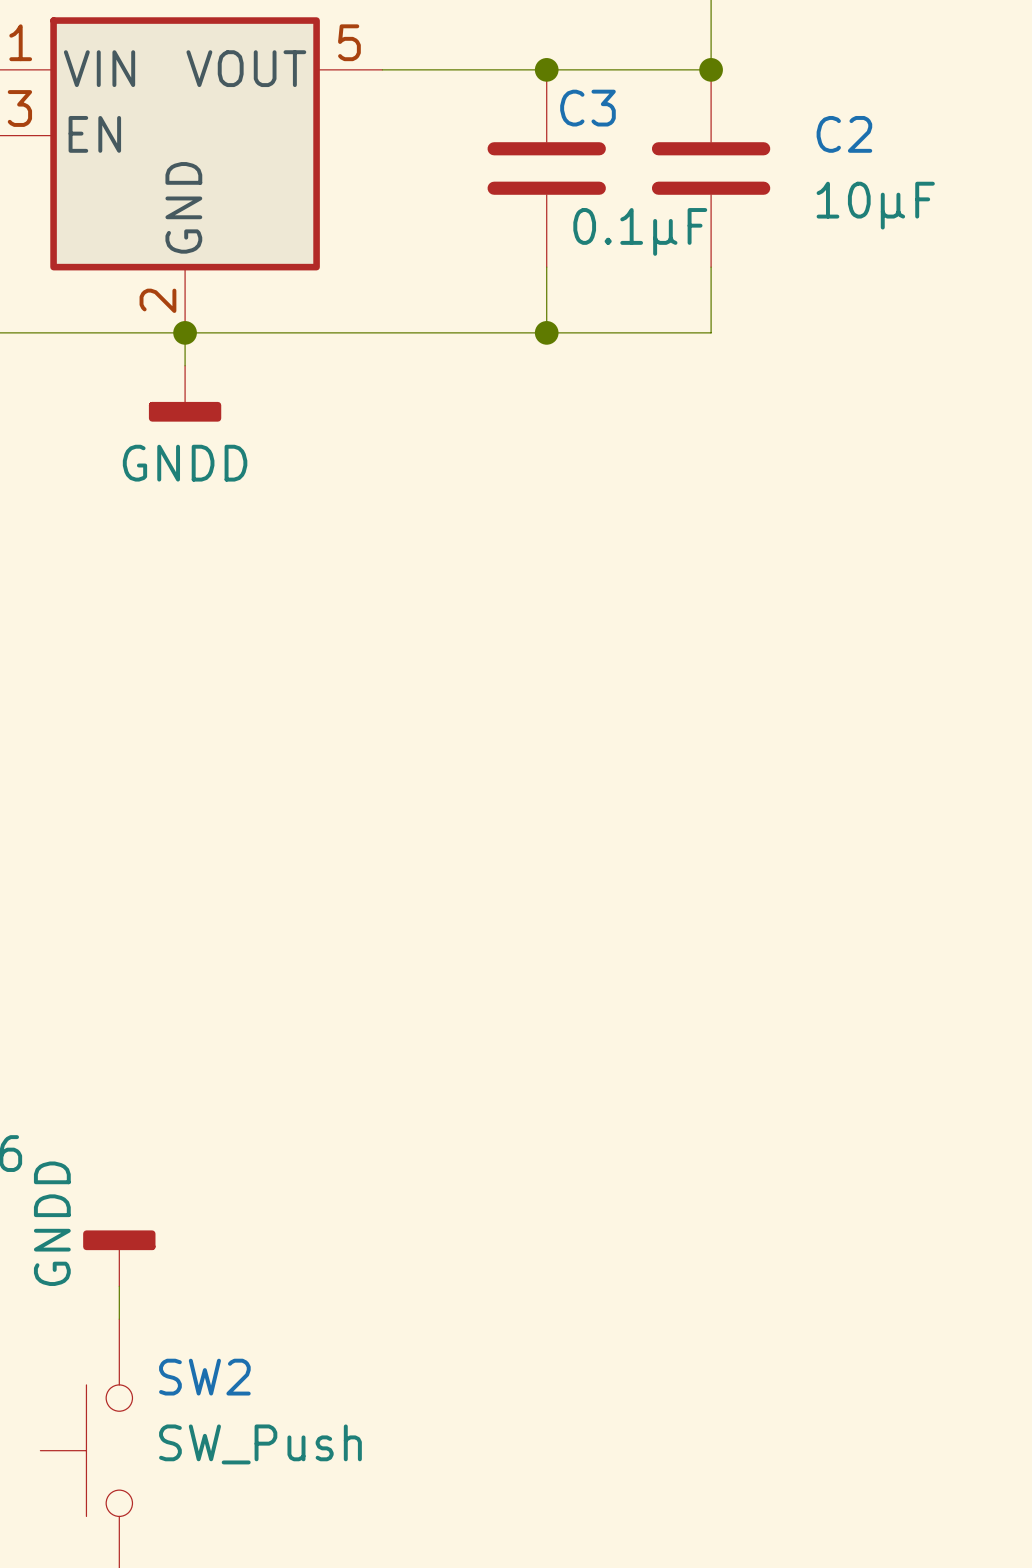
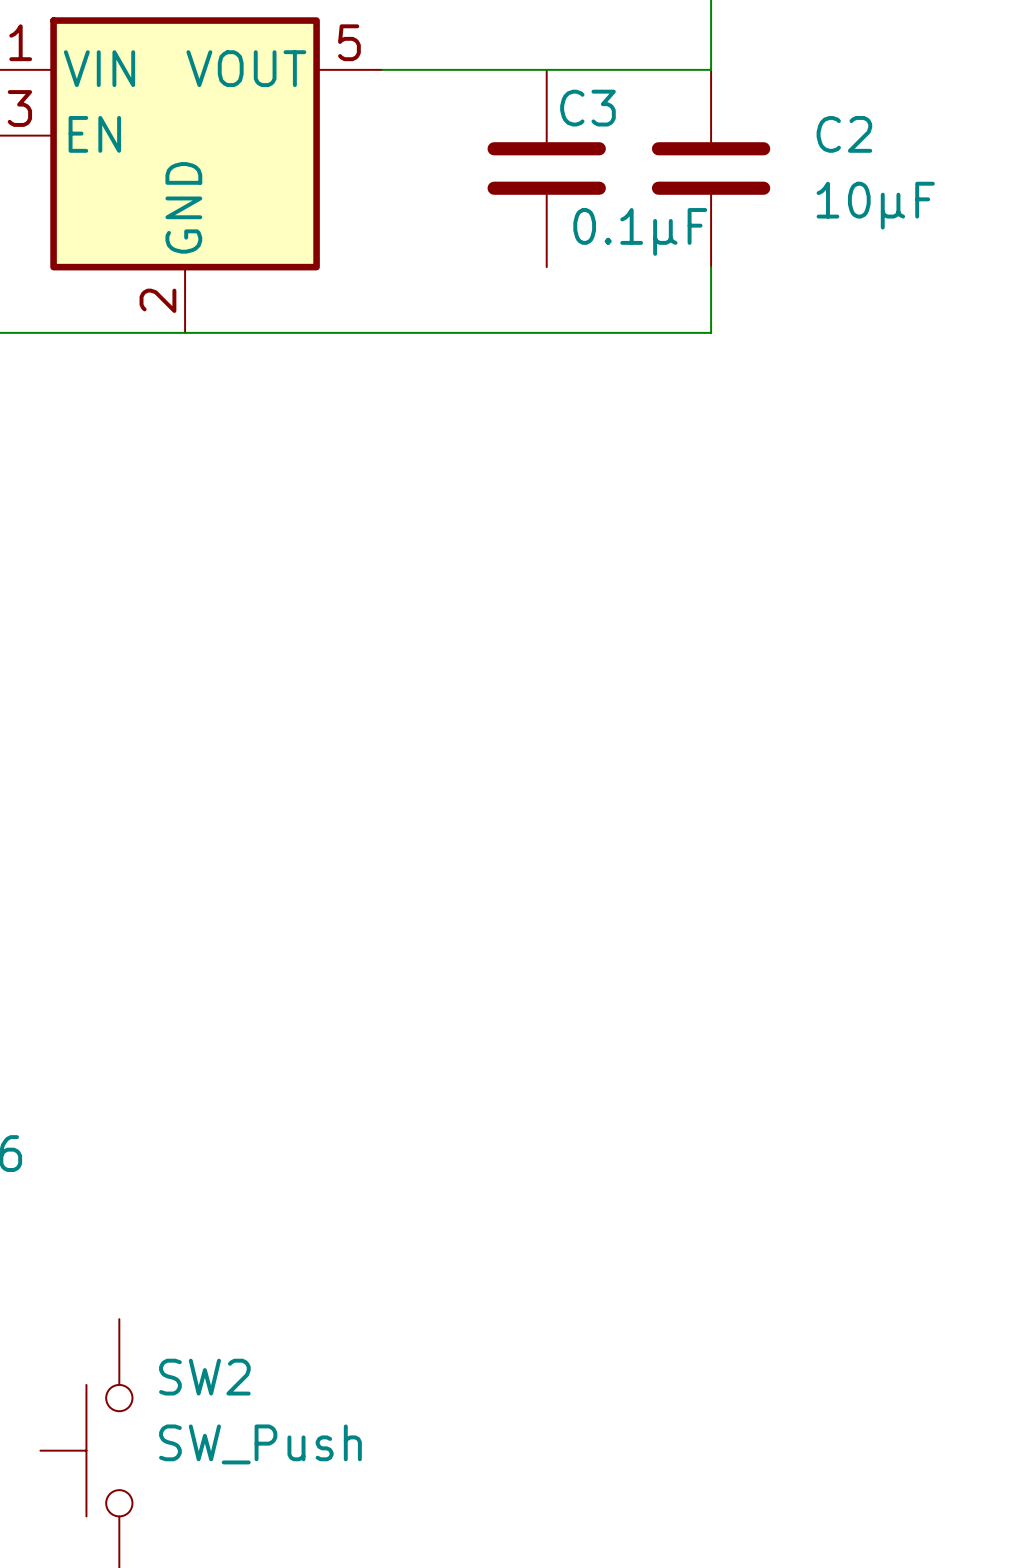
junction: (546, 69) -> none
junction: (711, 69) -> none
wire: (546, 267) (546, 332) -> none
wire: (185, 332) (185, 365) -> none
junction: (185, 332) -> none
junction: (546, 332) -> none
power symbol: GNDD (185, 393) -> none
power symbol: GNDD (119, 1258) -> none
wire: (119, 1286) (119, 1319) -> none

